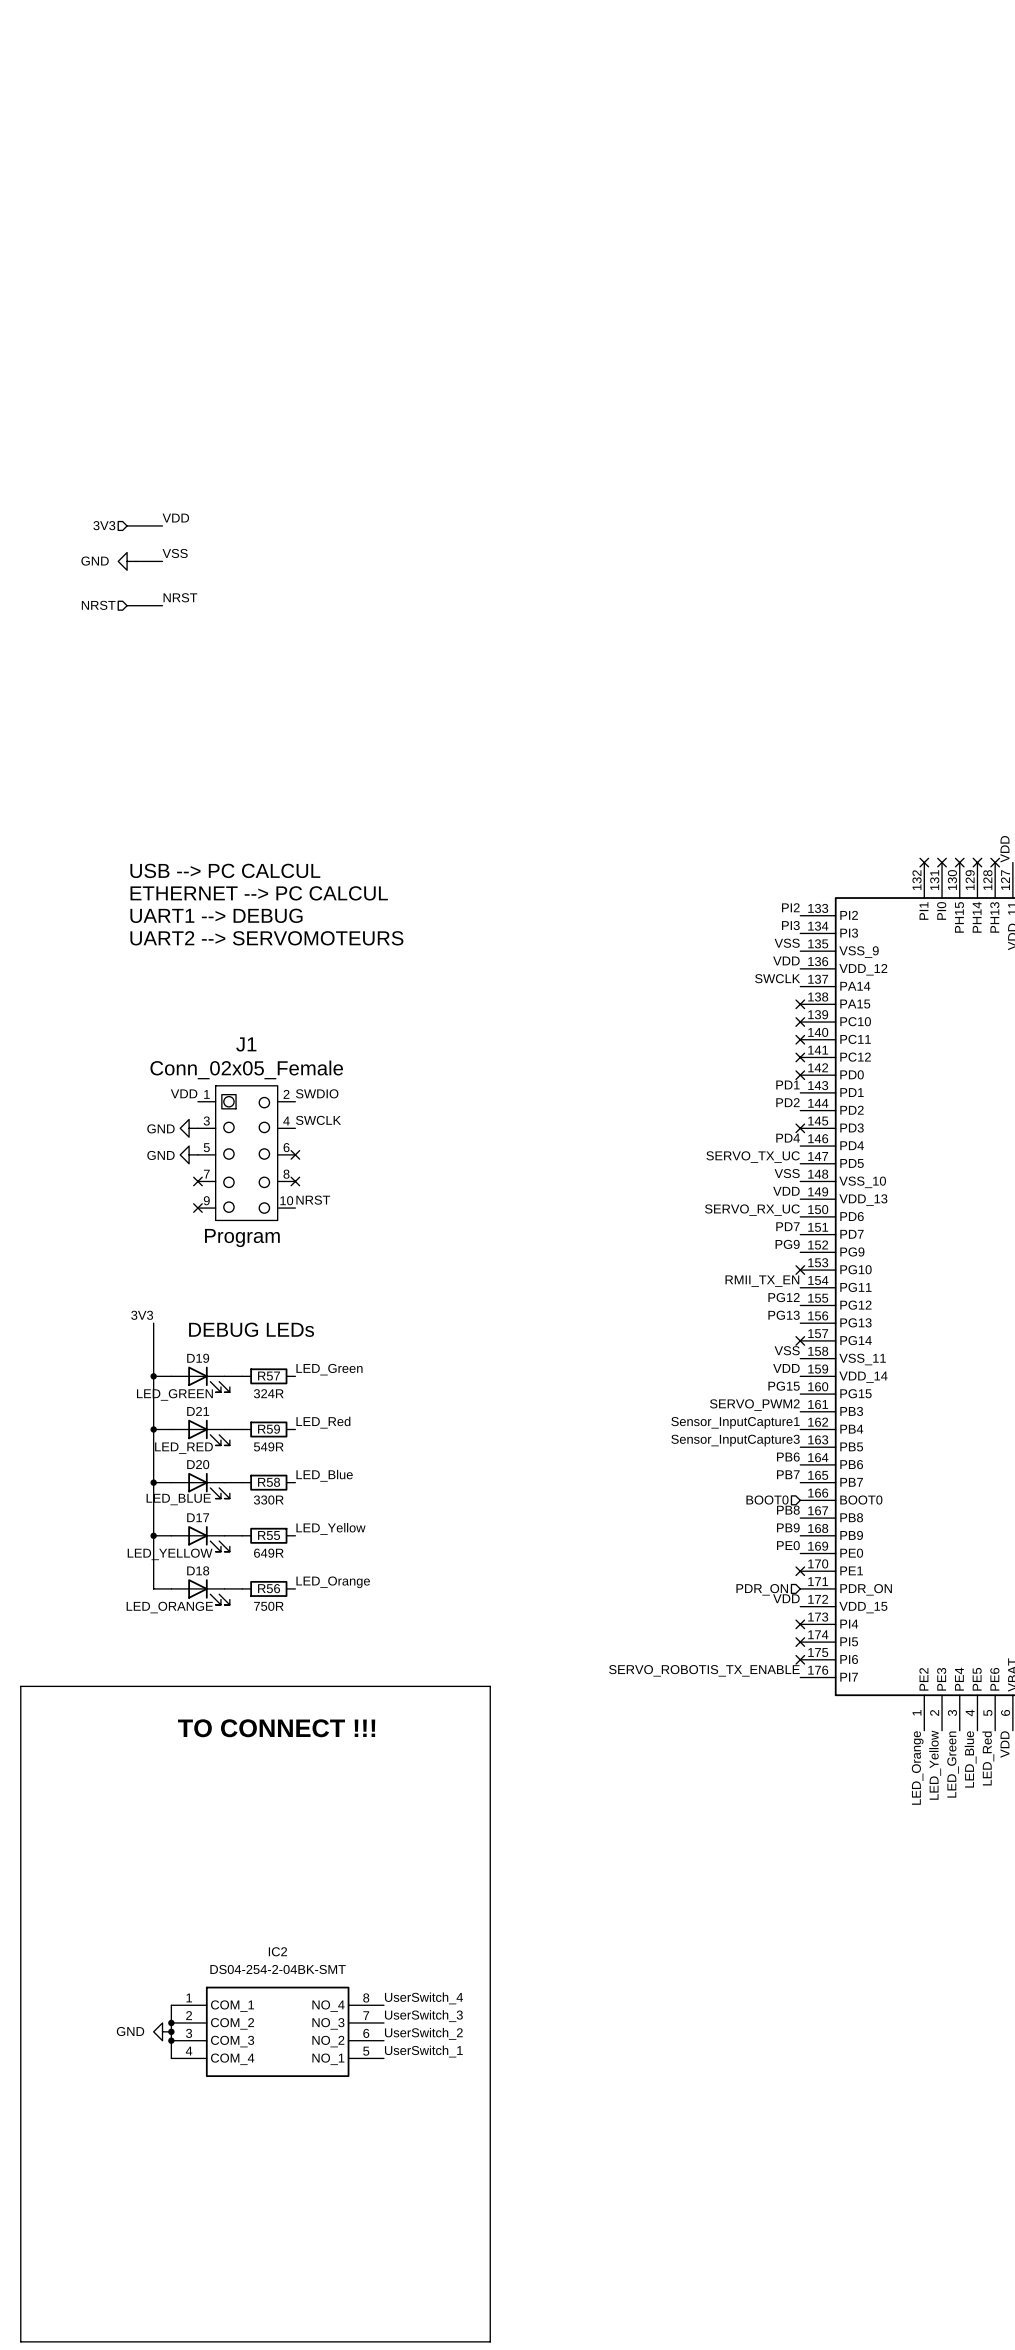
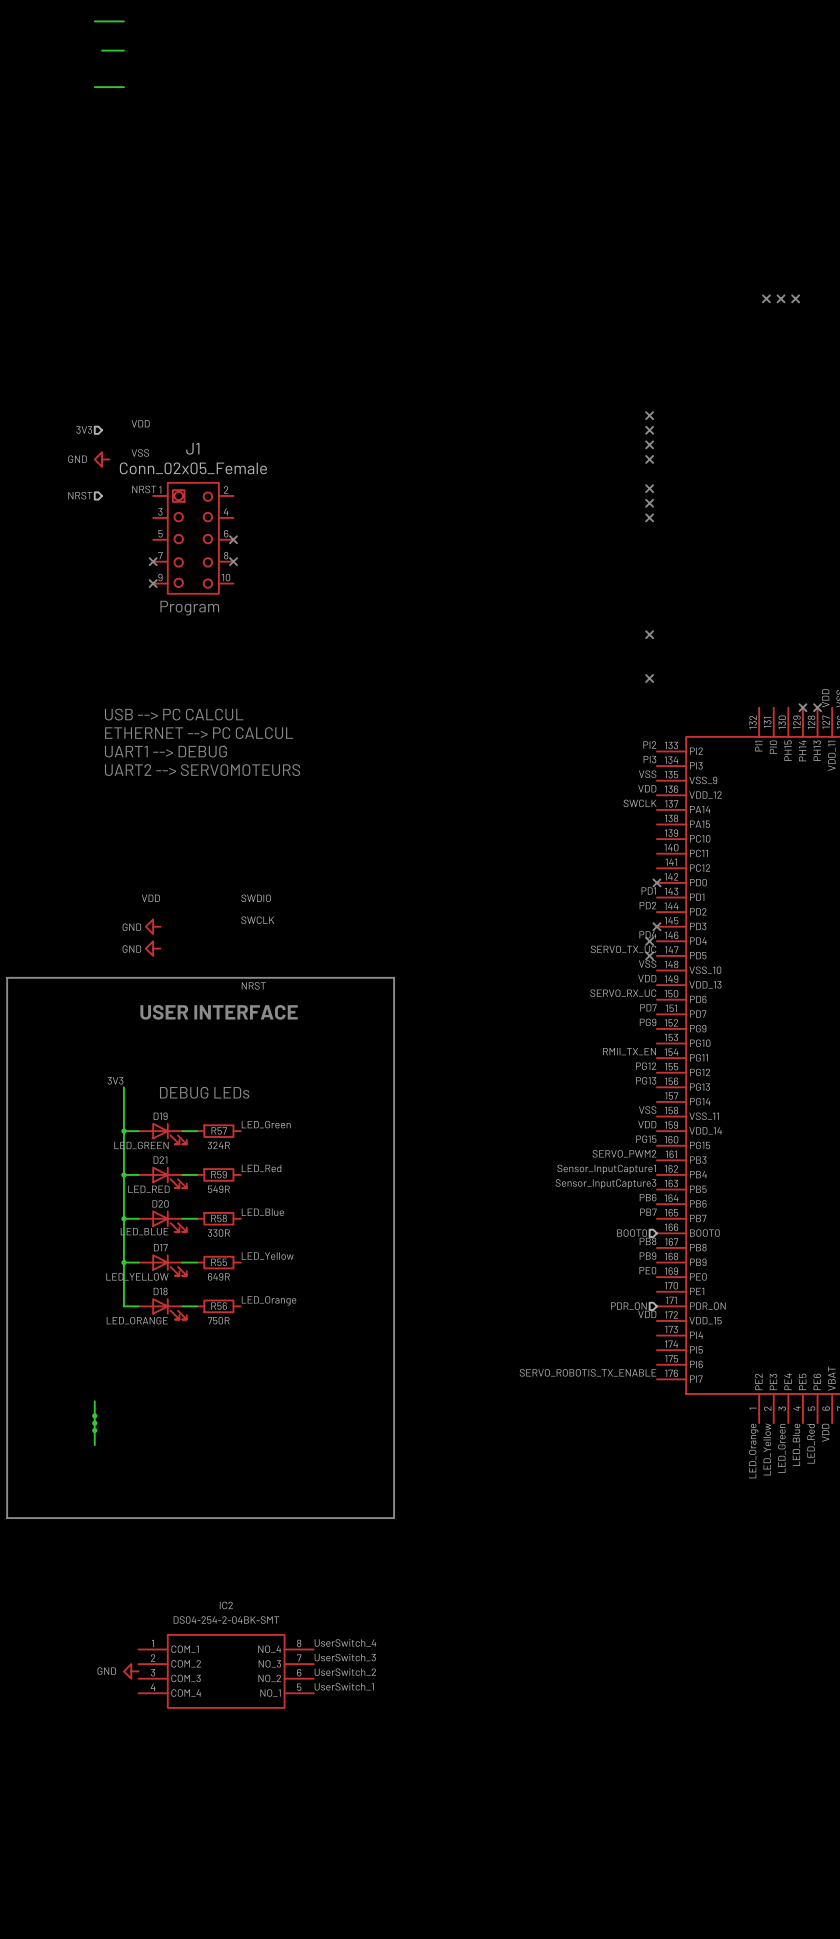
wire: none -> (94, 21) (123, 21)
wire: none -> (102, 50) (123, 50)
wire: none -> (94, 87) (123, 87)
no-connect mark: none -> (766, 298)
no-connect mark: none -> (781, 298)
no-connect mark: none -> (795, 298)
no-connect mark: none -> (649, 415)
wire: (127, 525) (162, 525) -> none
no-connect mark: none -> (649, 430)
no-connect mark: none -> (649, 444)
wire: (135, 561) (162, 561) -> none
no-connect mark: none -> (649, 459)
no-connect mark: none -> (649, 488)
wire: (127, 605) (162, 605) -> none
no-connect mark: none -> (649, 503)
no-connect mark: none -> (649, 517)
no-connect mark: none -> (233, 539)
no-connect mark: none -> (153, 561)
no-connect mark: none -> (233, 561)
no-connect mark: none -> (153, 583)
text: none -> Program (189, 608)
no-connect mark: none -> (649, 634)
no-connect mark: none -> (649, 678)
no-connect mark: (924, 862) -> none
no-connect mark: (942, 862) -> none
no-connect mark: (959, 862) -> none
no-connect mark: (800, 1004) -> none
no-connect mark: (800, 1022) -> none
no-connect mark: (800, 1039) -> none
no-connect mark: (800, 1057) -> none
no-connect mark: none -> (649, 941)
J1 position: (246, 1153) -> (193, 538)
no-connect mark: (295, 1154) -> none
no-connect mark: none -> (649, 955)
no-connect mark: (197, 1181) -> none
no-connect mark: (295, 1181) -> none
line: none -> (7, 977) (394, 977) (394, 1518) (7, 1518) (7, 977)
no-connect mark: (197, 1208) -> none
text: none -> USER INTERFACE (219, 1012)
text: Program (242, 1238) -> none
no-connect mark: (800, 1270) -> none
no-connect mark: (800, 1340) -> none
no-connect mark: (800, 1571) -> none
no-connect mark: (800, 1624) -> none
no-connect mark: (800, 1642) -> none
no-connect mark: (800, 1659) -> none
line: (20, 1686) (490, 1686) (490, 2341) (20, 2341) (20, 1686) -> none
wire: none -> (94, 1401) (94, 1445)
junction: none -> (94, 1415)
text: TO CONNECT !!! (276, 1728) -> none
junction: none -> (94, 1423)
junction: none -> (94, 1430)
wire: (171, 2005) (171, 2058) -> none
junction: (171, 2022) -> none
junction: (171, 2031) -> none
junction: (171, 2040) -> none

